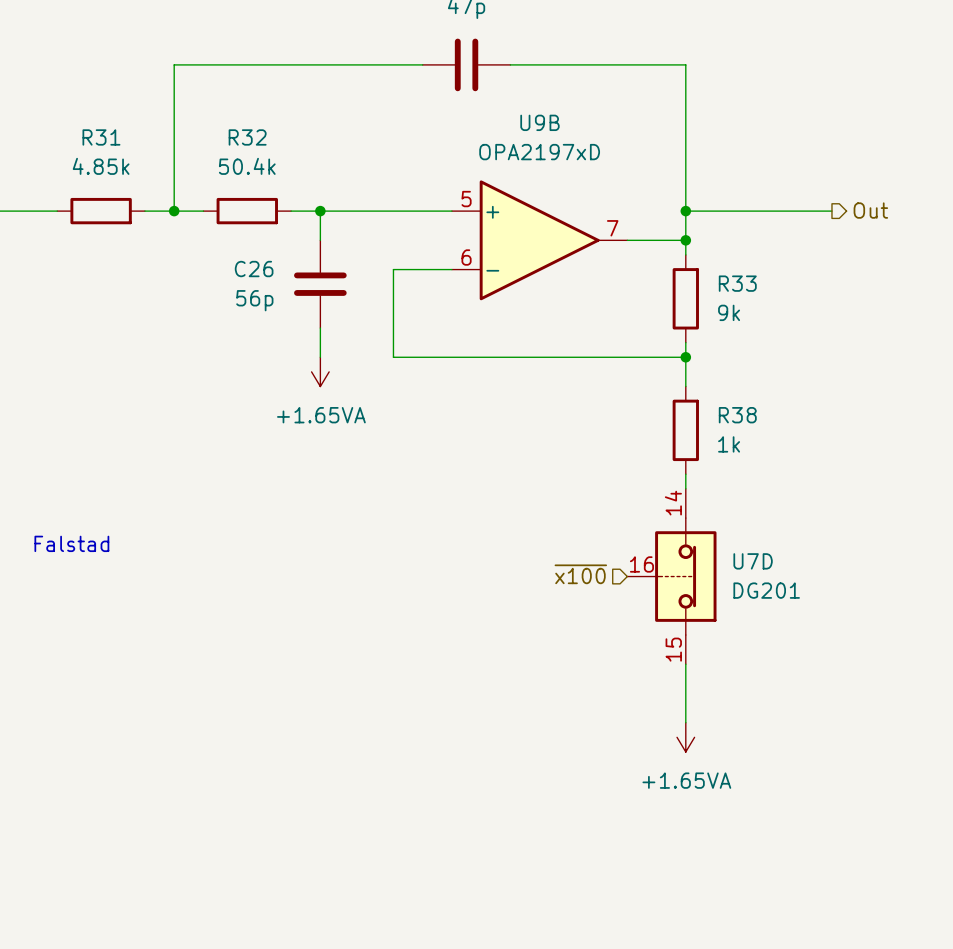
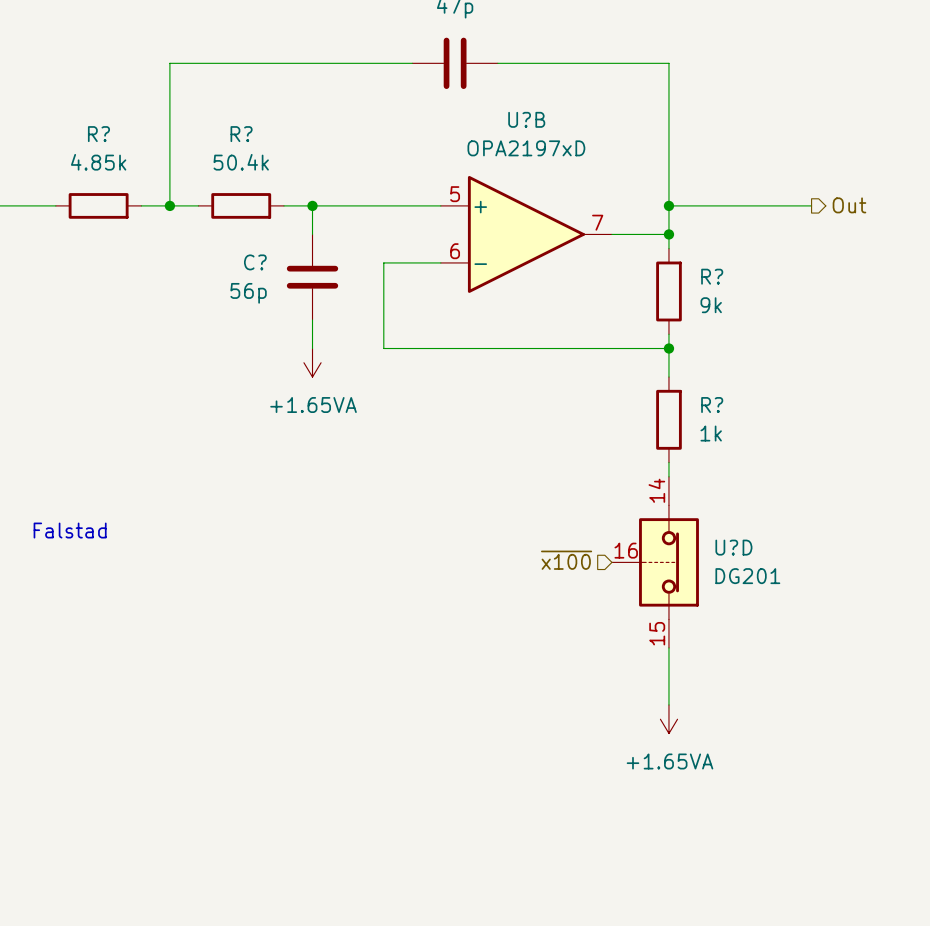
U9B name: U9B (539, 122) -> U?B (526, 119)
R31 name: R31 (101, 137) -> R? (98, 134)
R32 name: R32 (247, 137) -> R? (241, 134)
C26 name: C26 (254, 269) -> C? (255, 262)
R33 name: R33 (737, 283) -> R? (712, 276)
R38 name: R38 (737, 415) -> R? (712, 405)
U7D name: U7D (753, 561) -> U?D (733, 547)

